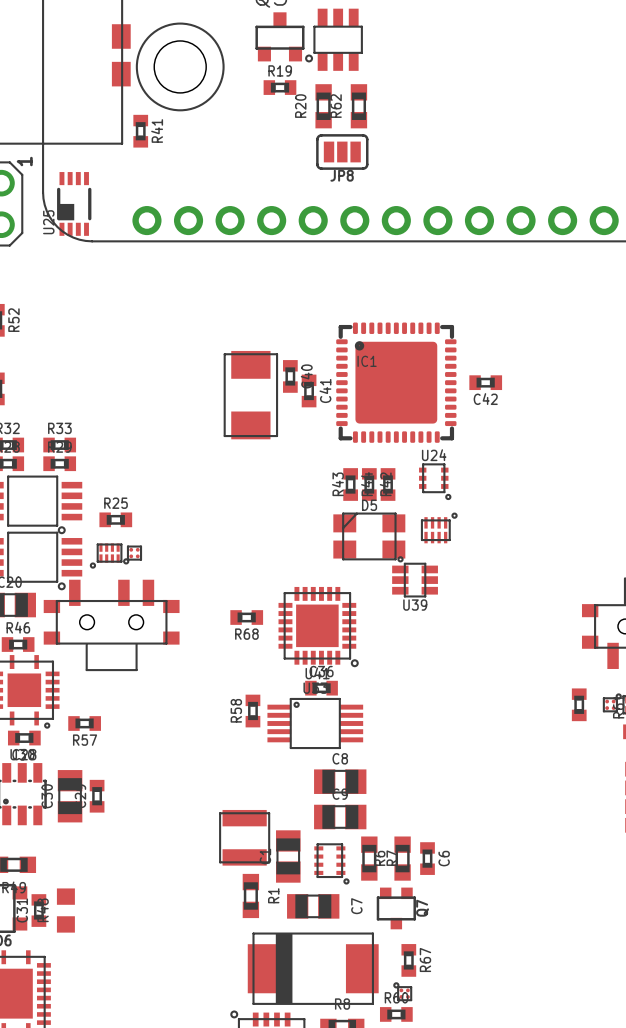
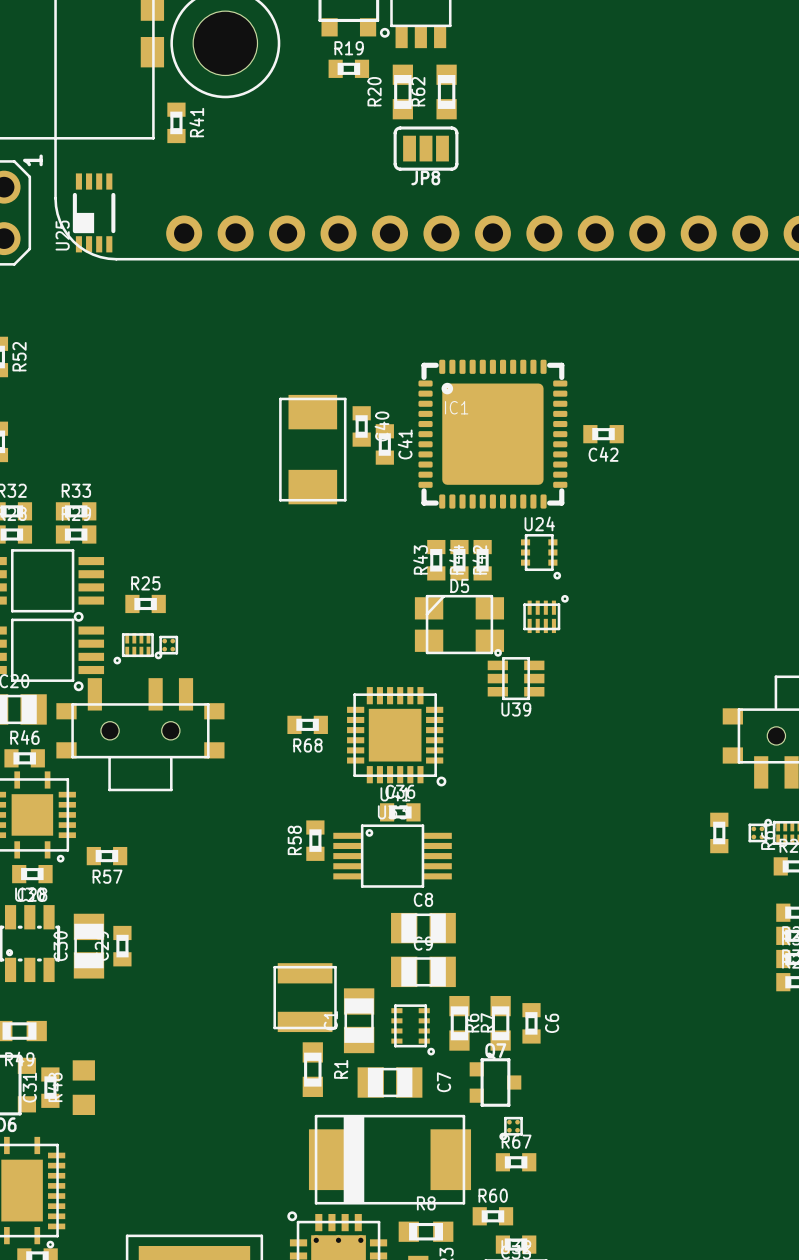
Q7 rotation: 0° (396, 908) -> 90° counterclockwise (495, 1082)
R67 rotation: 0° (408, 960) -> 90° clockwise (516, 1162)
part rotation: 0° (402, 991) -> 90° counterclockwise (511, 1128)
part position: (402, 991) -> (511, 1128)

